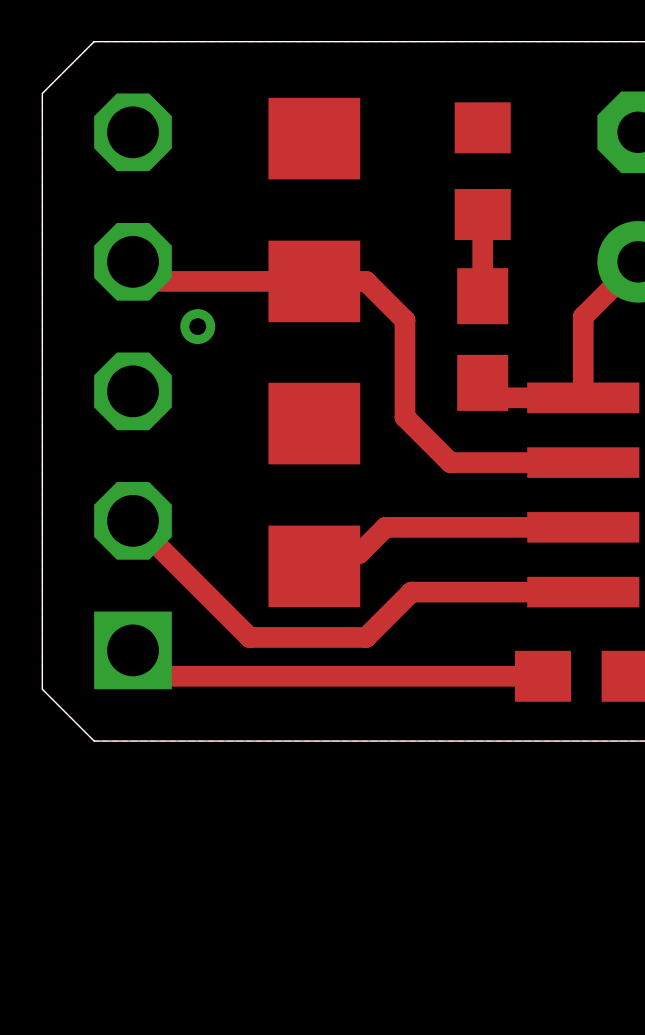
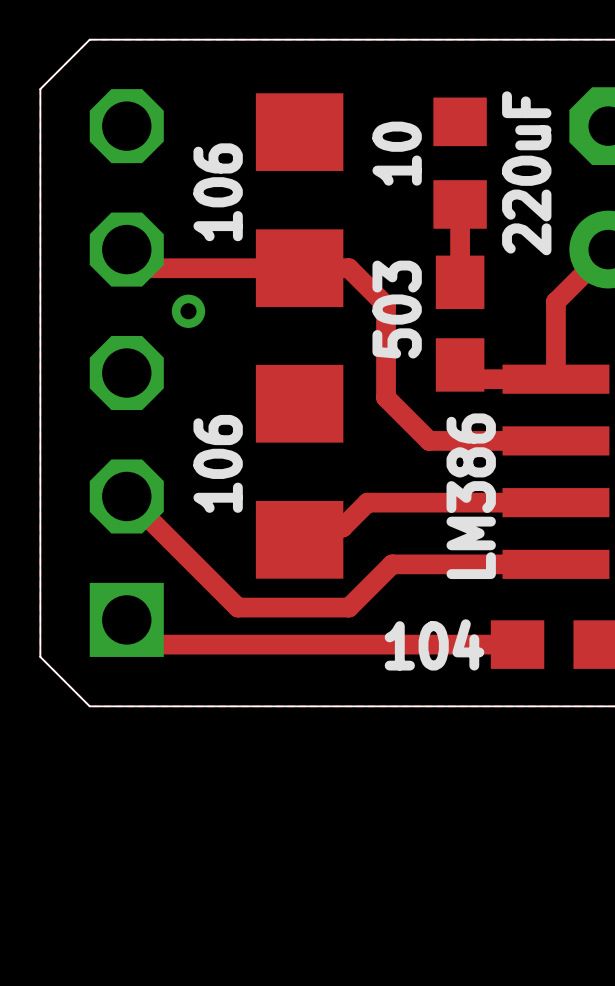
text: none -> 10 (397, 153)
text: none -> 220uF (526, 173)
text: none -> 106 (218, 192)
text: none -> 503 (397, 309)
text: none -> 106 (218, 463)
text: none -> LM386 (471, 496)
text: none -> 104 (434, 644)

